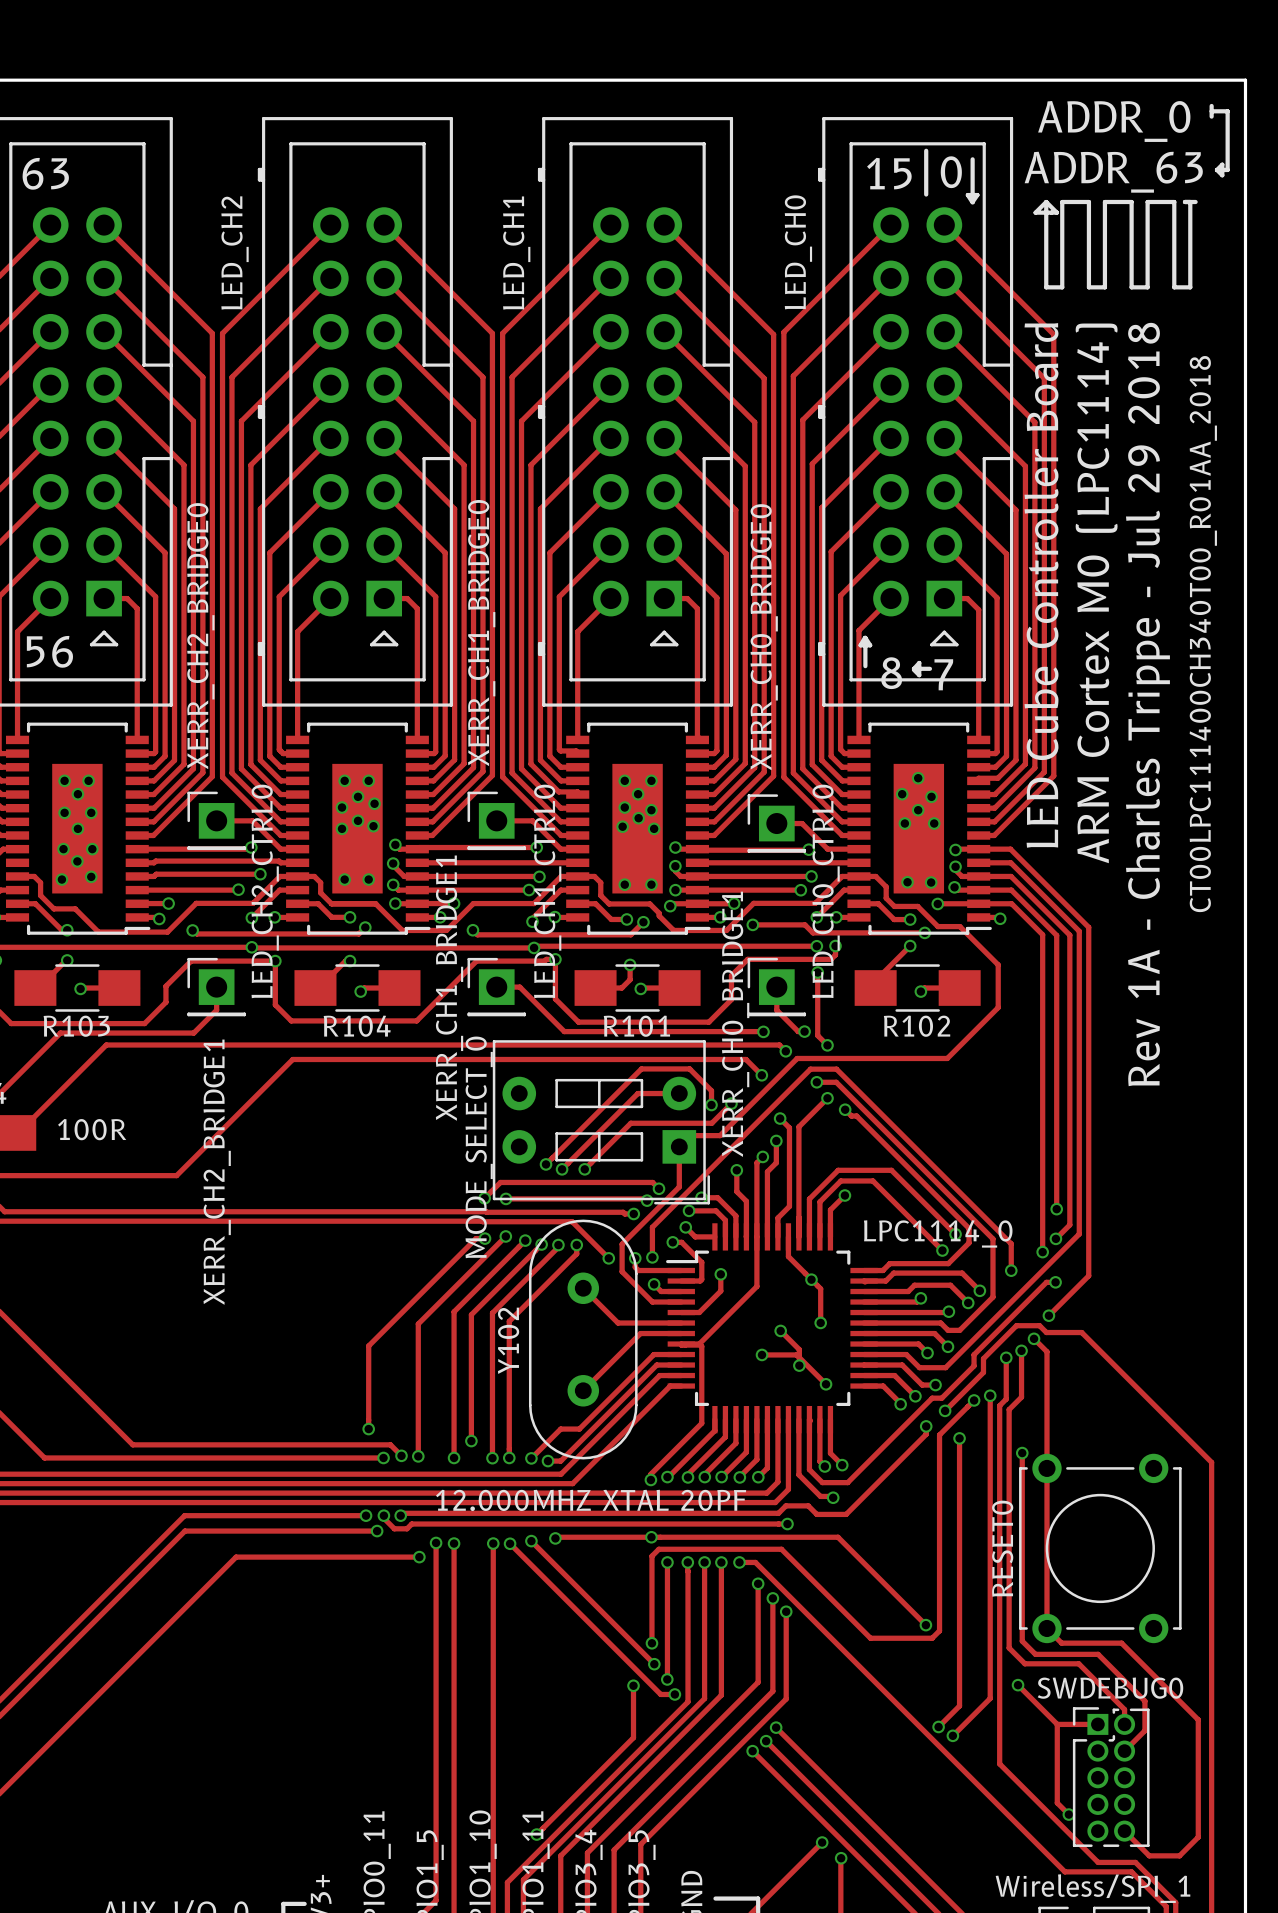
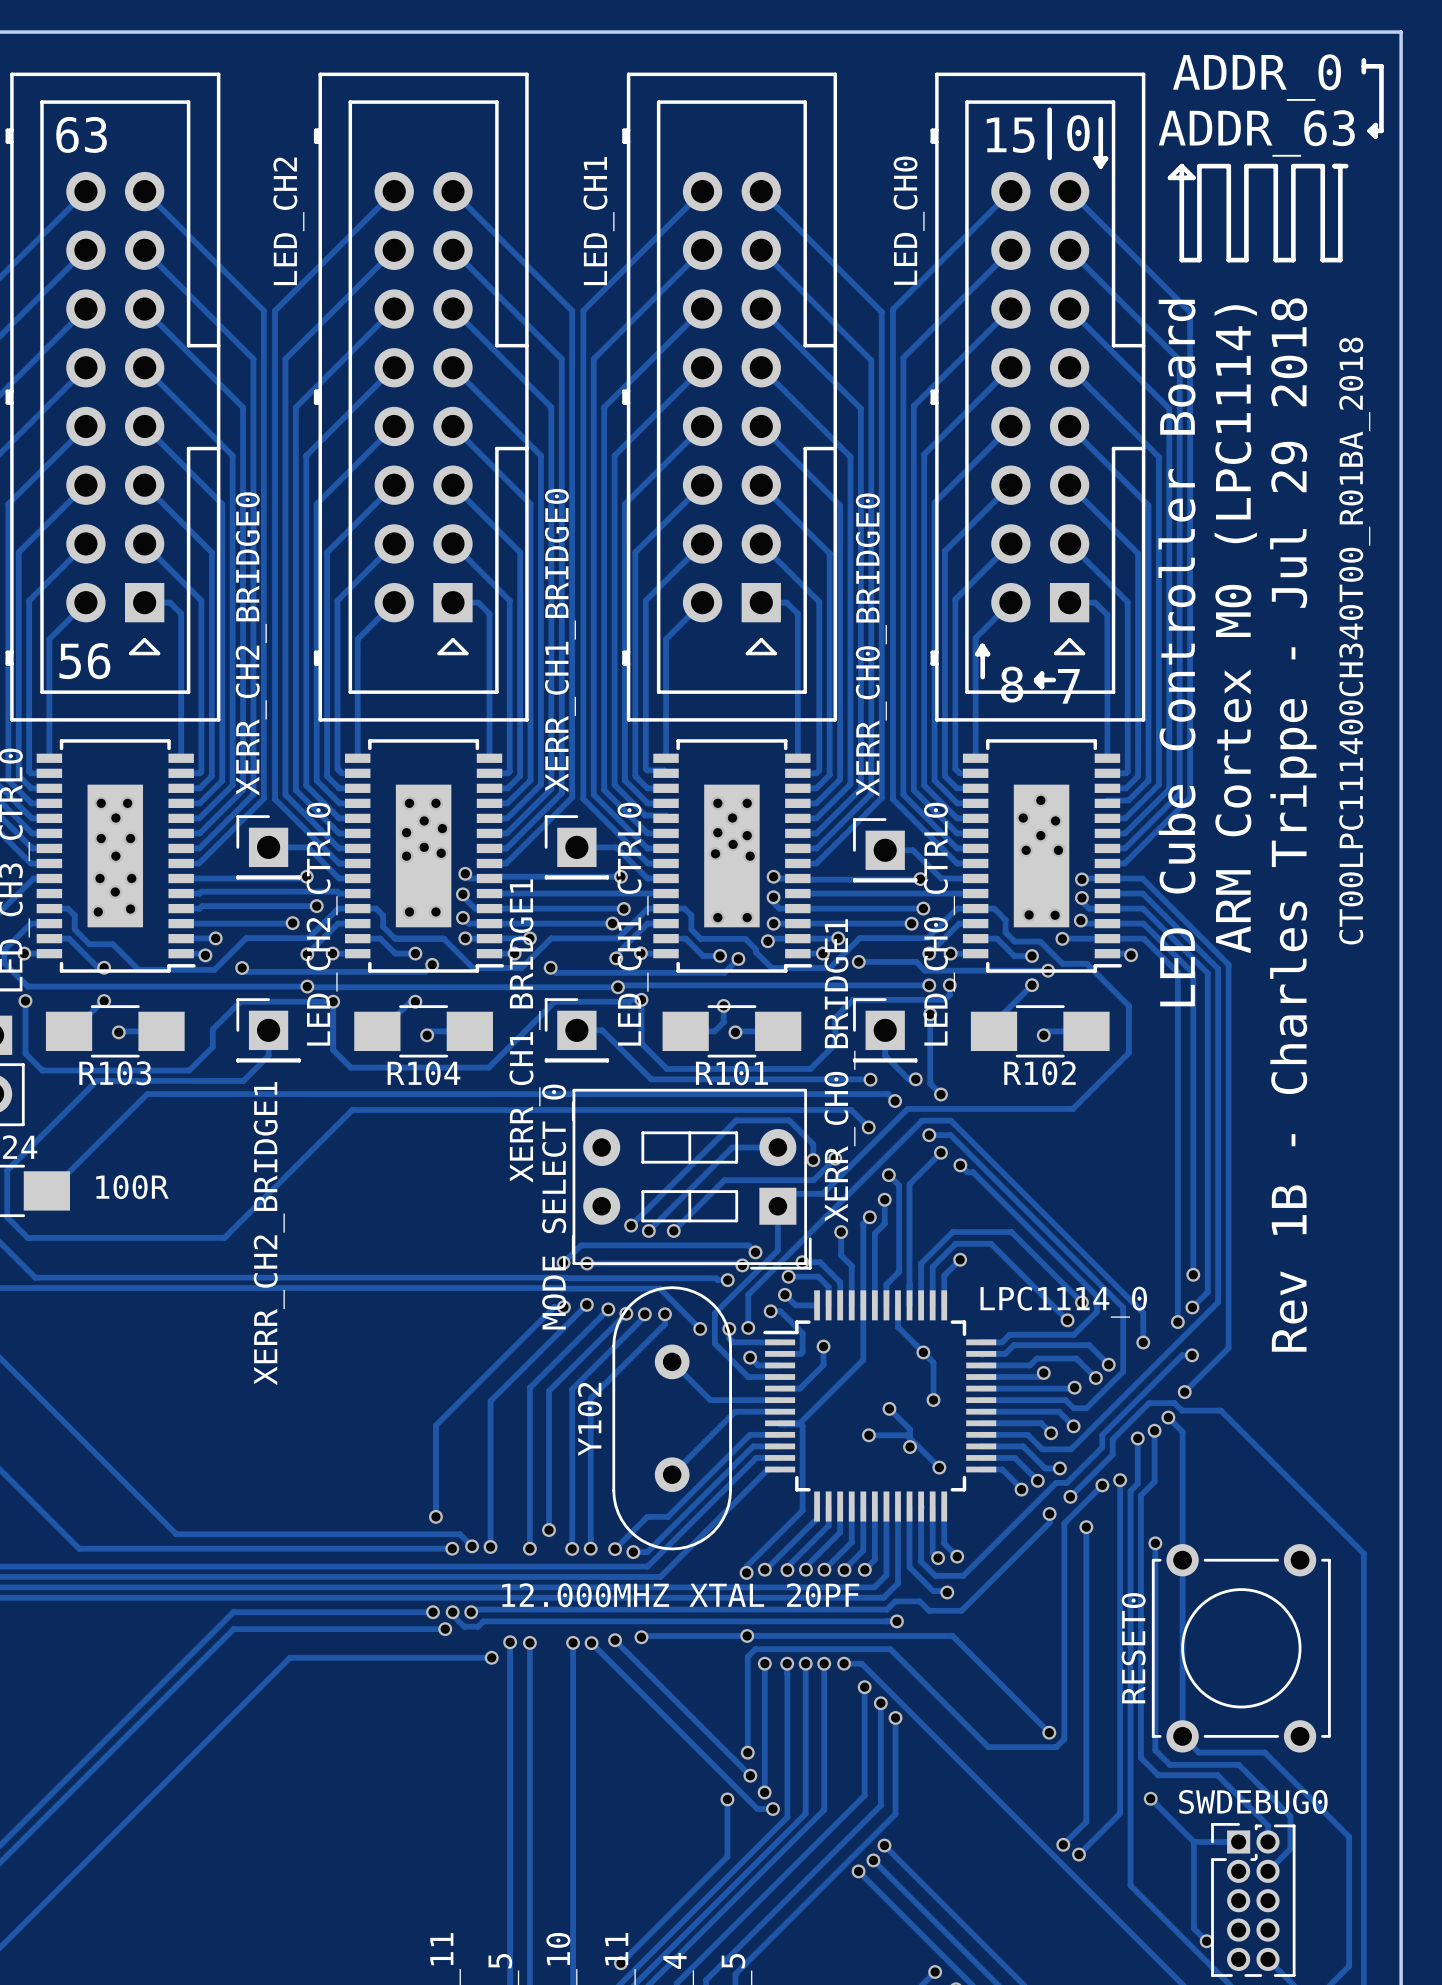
text: CT00LPC111400CH340T00_R01AA_2018 (1203, 634) -> CT00LPC111400CH340T00_R01BA_2018 (1354, 641)
text: Rev 1A - Charles Trippe - Jul 29 2018 (1147, 704) -> Rev 1B - Charles Trippe - Jul 29 2018 (1293, 825)

